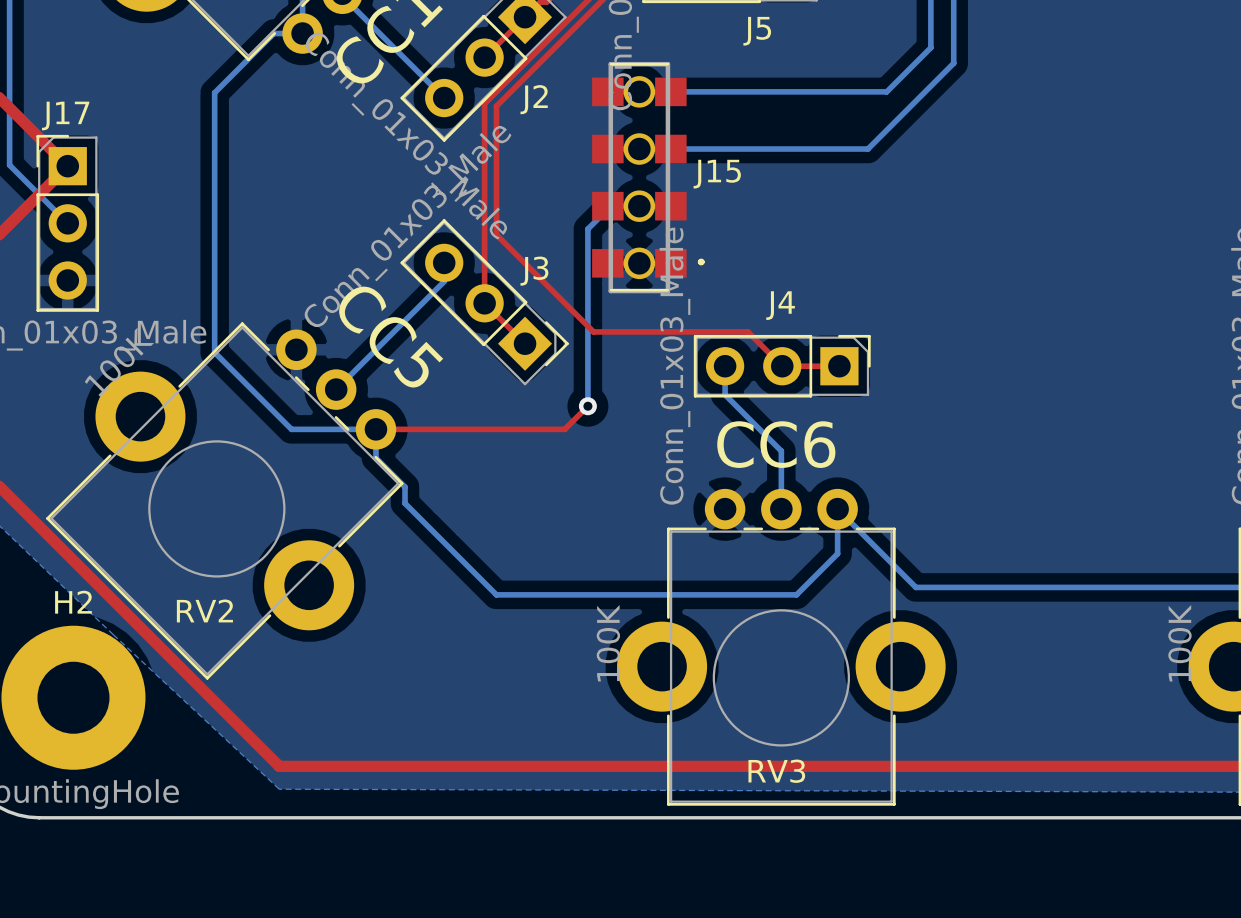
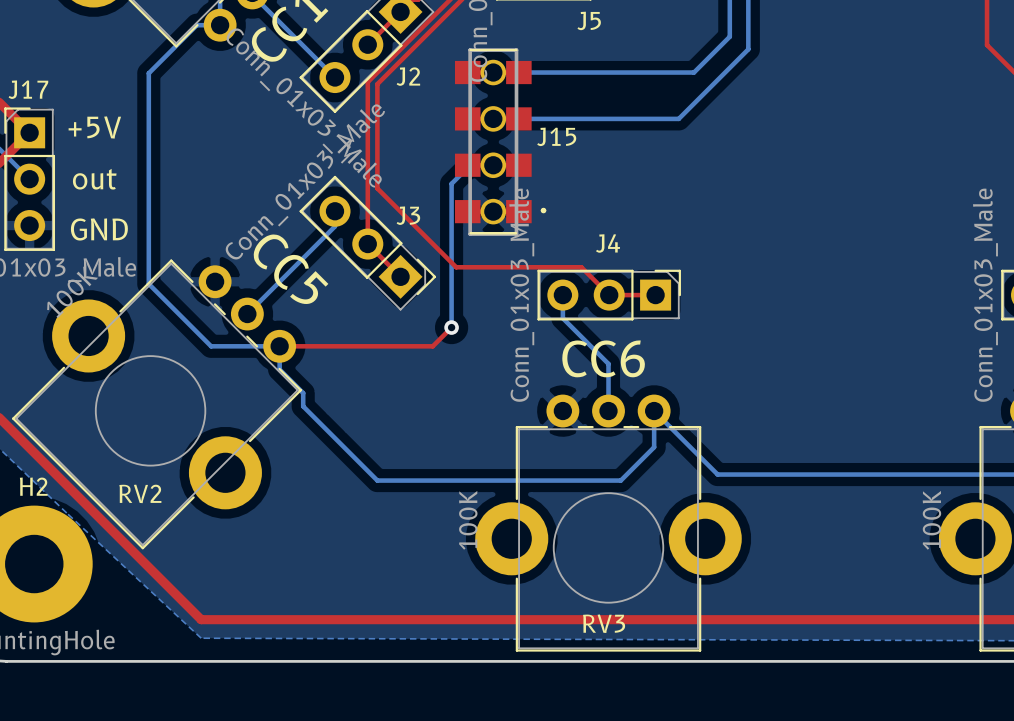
text: none -> +5V (94, 127)
text: none -> out (94, 179)
text: none -> GND (99, 229)

